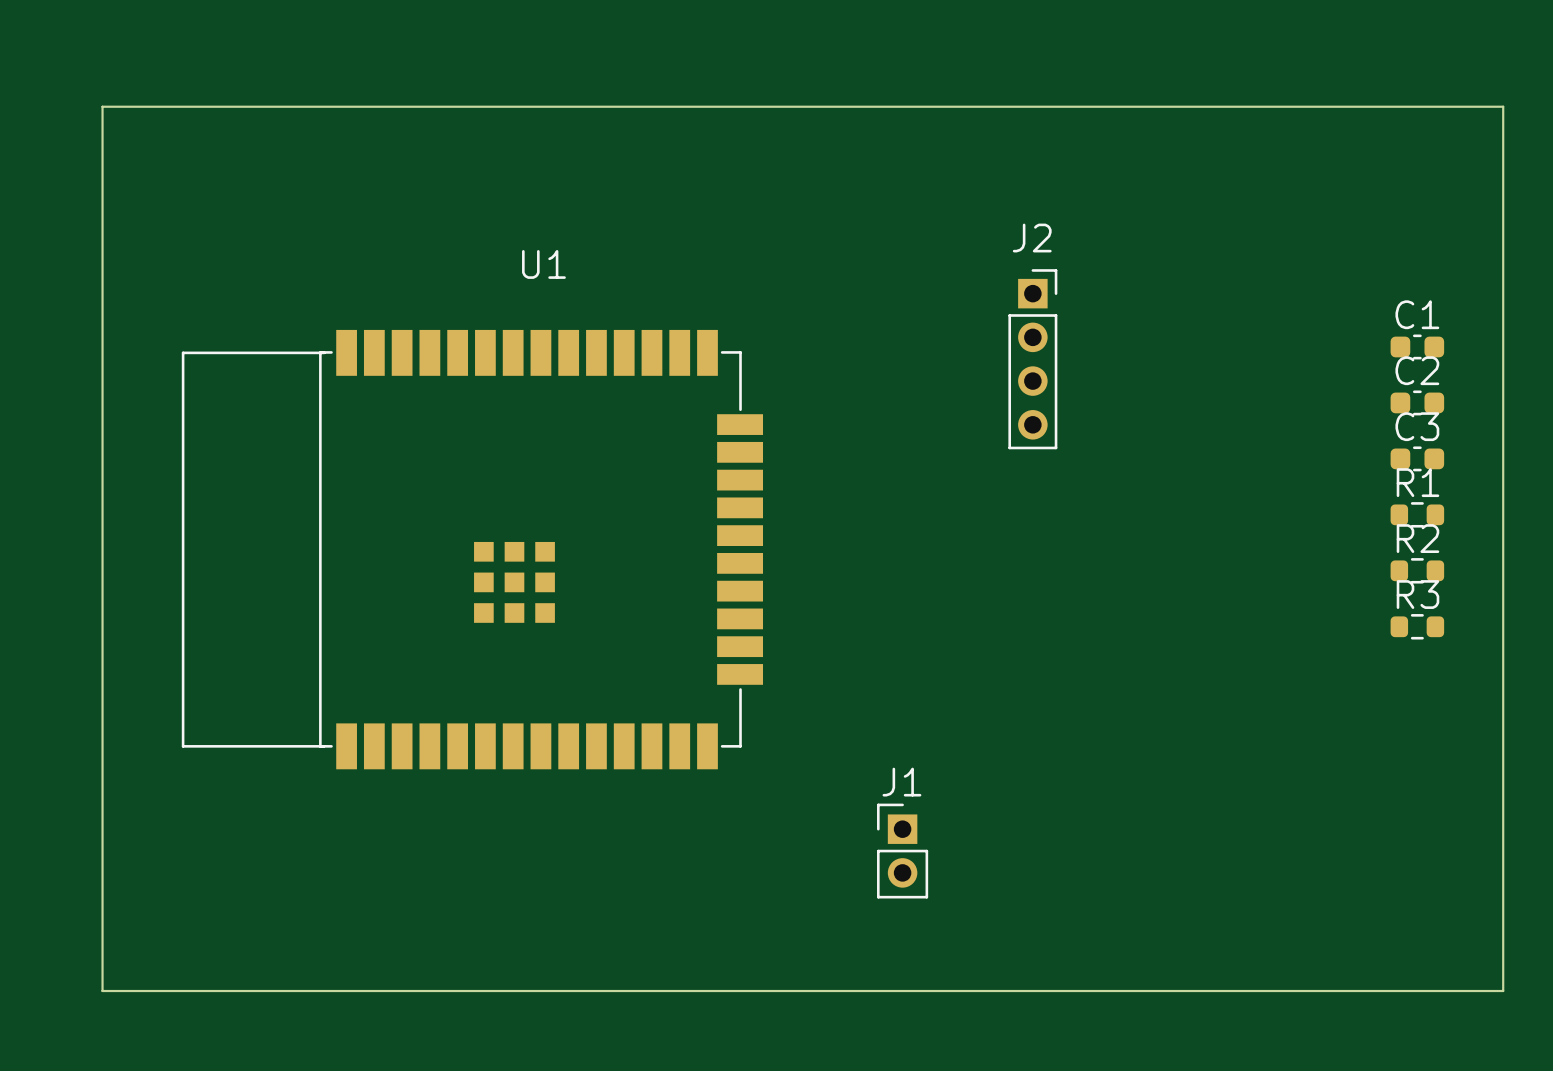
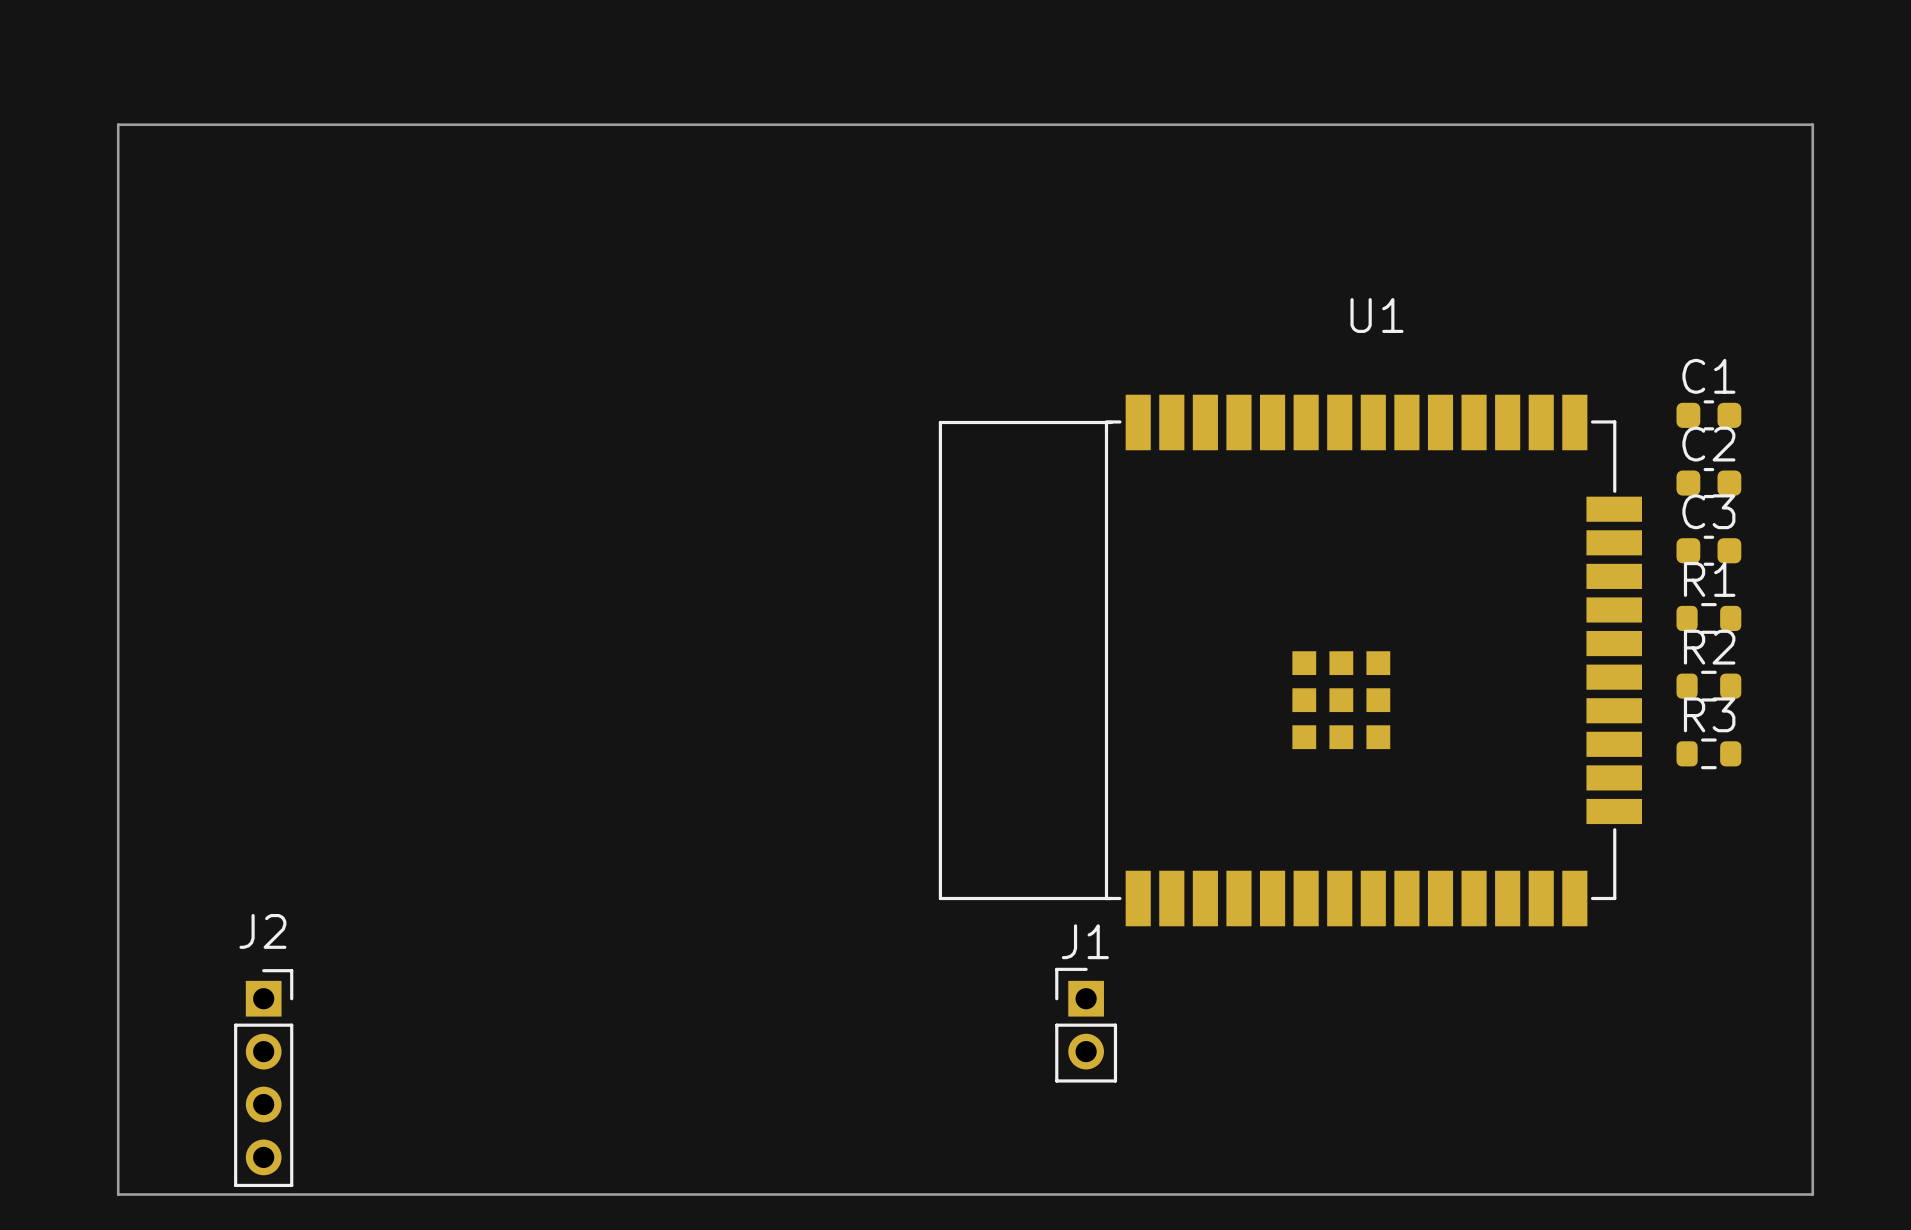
J2 position: (1032, 359) -> (263, 1078)
U1 position: (472, 549) -> (1290, 660)

